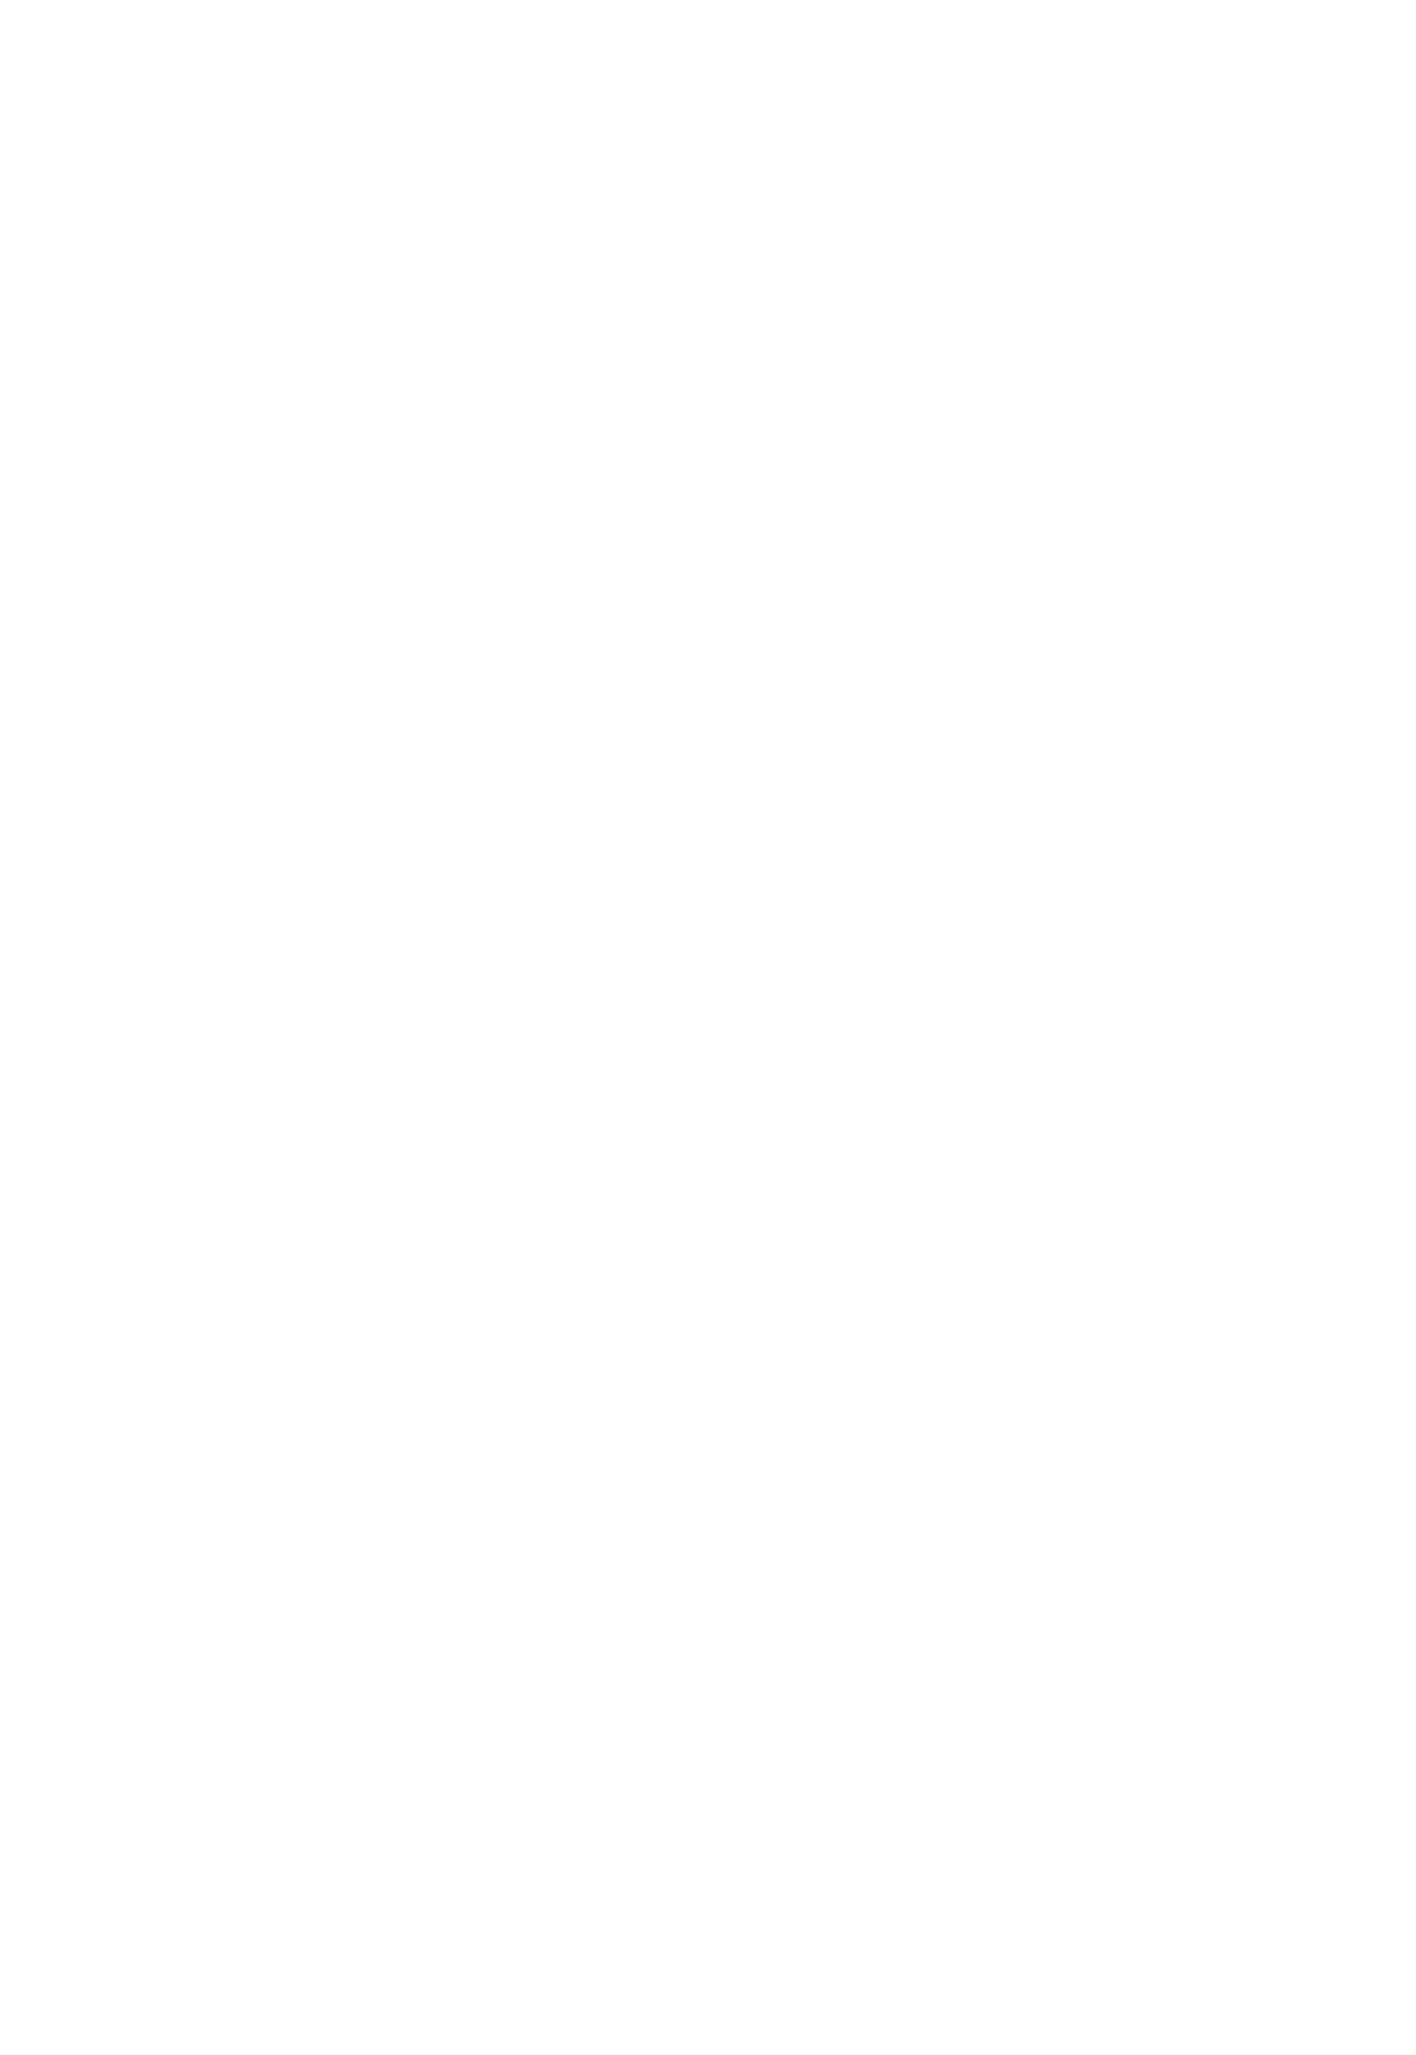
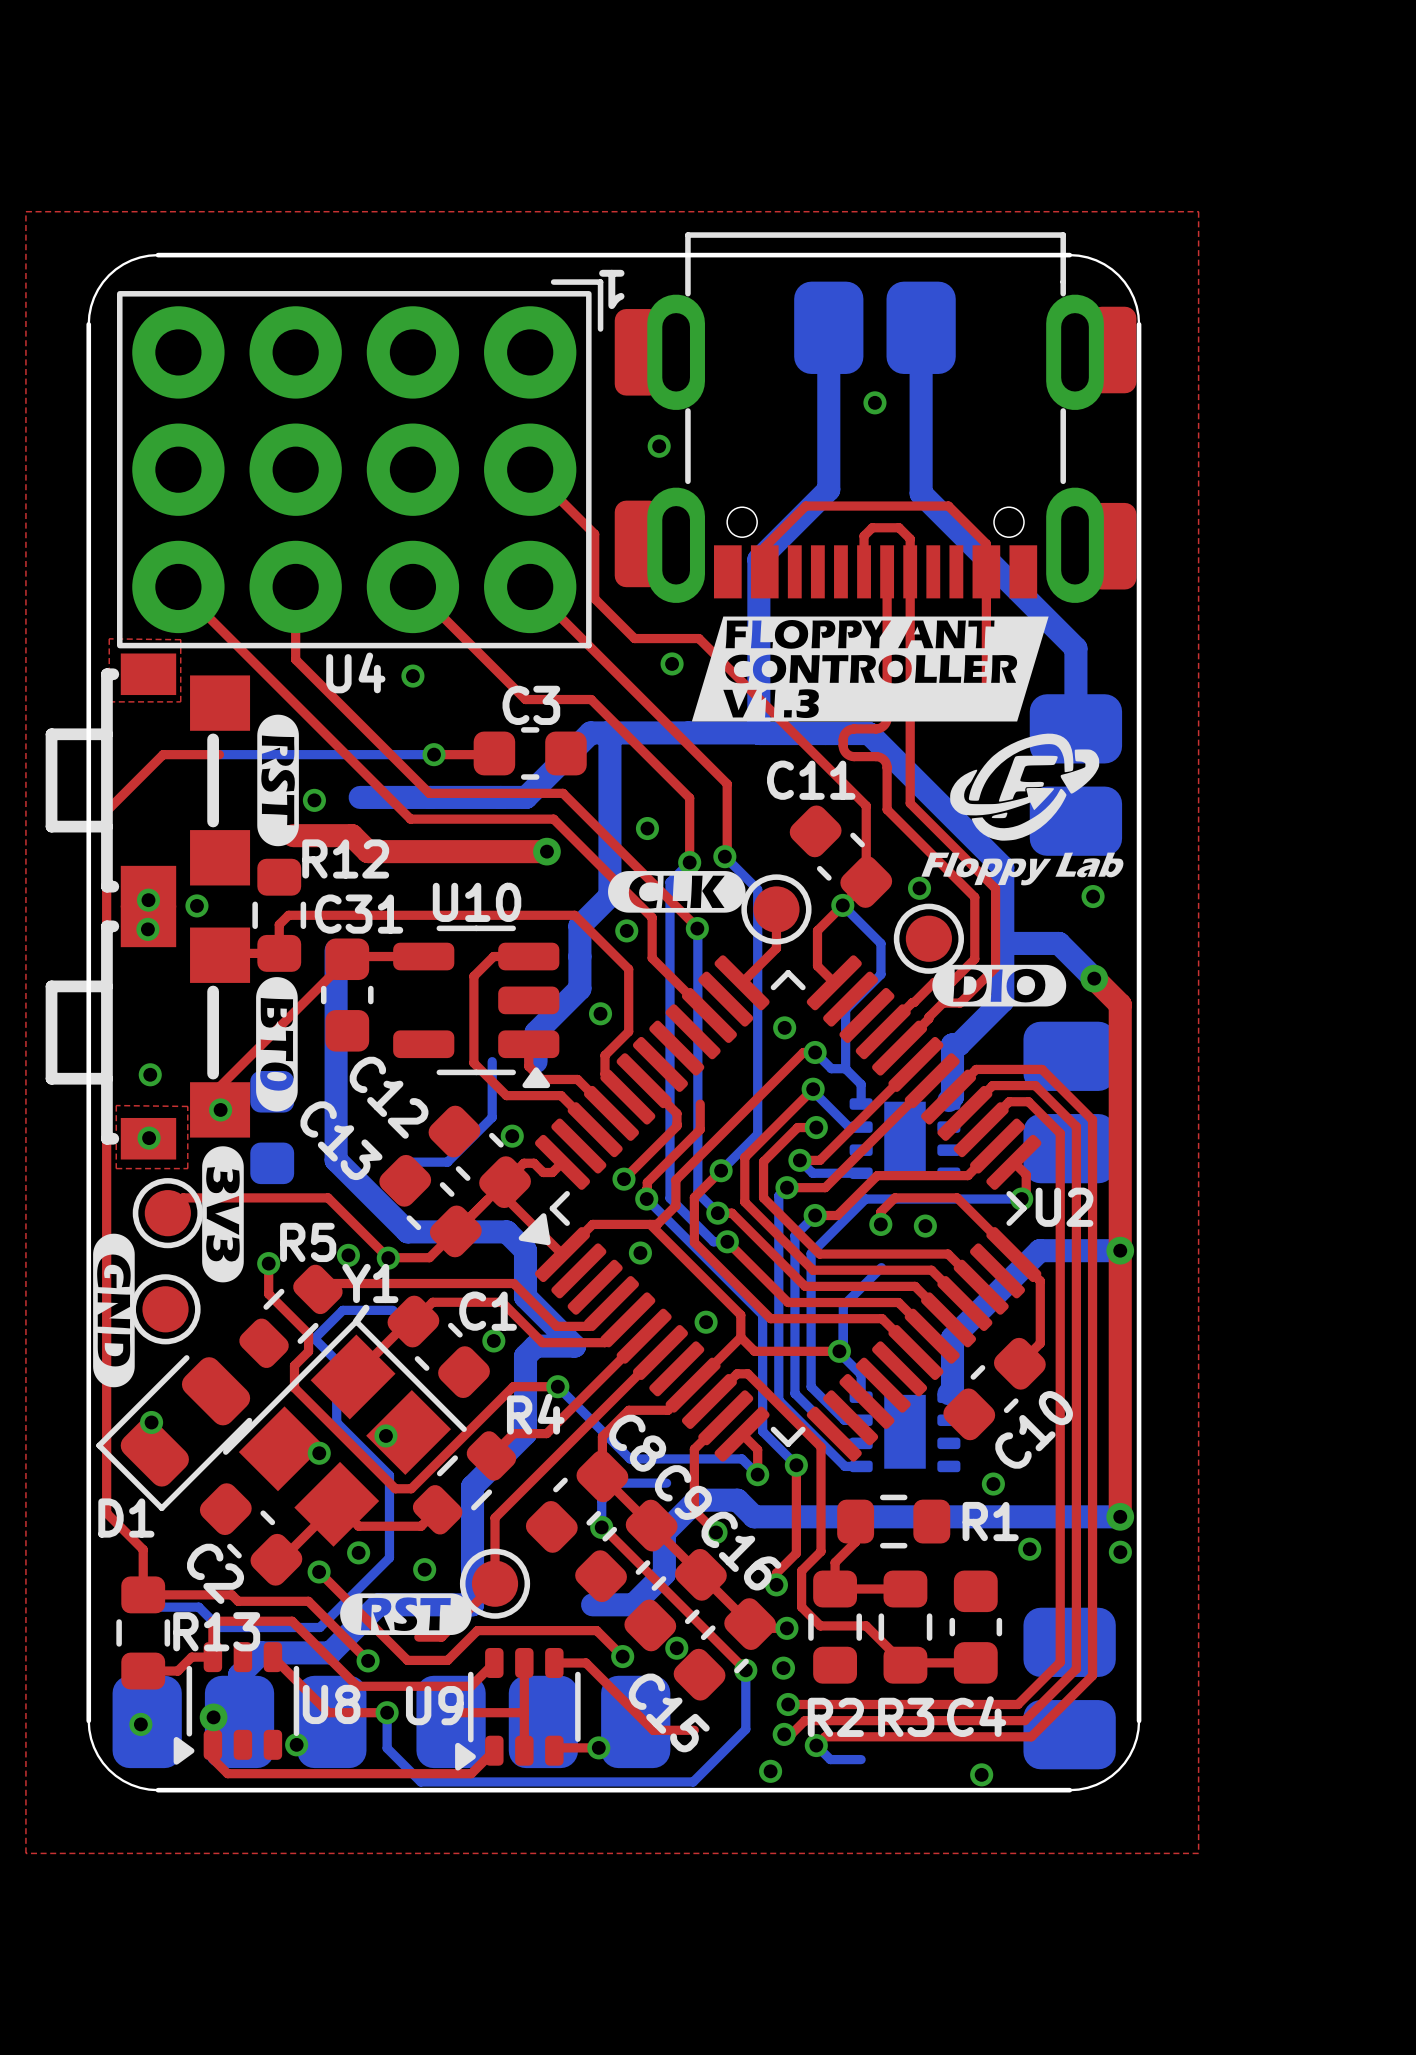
top zone outline: none -> (25, 211) (25, 1853) (1198, 1853) (1198, 211) (25, 211)
board edge: none -> (157, 255) (1069, 255) (1087, 257) (1104, 264) (1118, 275) (1129, 289) (1136, 306) (1139, 324) (1139, 1720) (1136, 1738) (1129, 1755) (1118, 1769) (1104, 1780) (1087, 1787) (1069, 1790) (157, 1790) (140, 1787) (123, 1780) (109, 1769) (98, 1755) (91, 1738) (88, 1720) (88, 324) (94, 297) (109, 275) (131, 260) (157, 255)
bottom track: none -> (828, 327) (828, 489) (758, 559) (758, 732) (590, 732) (526, 797) (360, 797)
part: none -> (874, 327)
bottom track: none -> (921, 327) (921, 493) (1075, 648) (1075, 728)
via: none -> (874, 402)
part: none -> (875, 417)
via: none -> (659, 446)
U4: none -> (360, 463)
top track: none -> (530, 469) (594, 534) (594, 598) (634, 638) (698, 638) (866, 805) (866, 881) (817, 930) (817, 966) (834, 982)
top track: none -> (764, 571) (764, 547) (805, 506) (948, 506) (986, 543) (986, 686) (978, 694)
top track: none -> (864, 571) (864, 536) (872, 527) (899, 527) (910, 538) (910, 803) (995, 888) (995, 967) (960, 1003) (942, 1003) (899, 1048)
top track: none -> (887, 571) (886, 720) (883, 725) (878, 728) (848, 730) (843, 737) (843, 748) (850, 756) (877, 756) (884, 760) (887, 767) (887, 809) (974, 897) (974, 959) (951, 982) (934, 982) (883, 1031)
top track: none -> (178, 586) (410, 819) (553, 819) (652, 917) (652, 958) (709, 1015)
top track: none -> (295, 586) (295, 659) (429, 793) (563, 793) (697, 927)
top track: none -> (412, 586) (525, 699) (591, 699) (689, 798) (689, 862)
top track: none -> (530, 586) (727, 783) (727, 854) (724, 856)
drawing: none -> [691, 616, 1124, 886]
top zone outline: none -> (109, 638) (180, 639) (180, 701) (109, 701) (109, 638)
via: none -> (672, 663)
via: none -> (412, 676)
drawing: none -> [257, 714, 299, 847]
bottom track: none -> (607, 732) (609, 735) (609, 895) (579, 926) (579, 988) (536, 1032) (536, 1061)
bottom track: none -> (759, 733) (869, 733) (1002, 867) (1002, 1000) (958, 1044) (952, 1044) (952, 1096) (948, 1100)
top track: none -> (494, 753) (434, 754)
C3: none -> (530, 753)
top track: none -> (219, 754) (163, 754) (106, 811) (106, 1513) (143, 1549) (143, 1594) (231, 1594) (238, 1601) (308, 1601) (368, 1660)
bottom track: none -> (219, 754) (434, 754)
via: none -> (434, 754)
part: none -> (1075, 775)
part: none -> (147, 780)
via: none -> (314, 800)
via: none -> (647, 828)
top track: none -> (293, 835) (352, 835) (368, 851) (546, 851)
via: none -> (546, 851)
bottom track: none -> (724, 856) (757, 889) (757, 1134) (721, 1170)
via: none -> (724, 856)
C11: none -> (840, 856)
bottom track: none -> (689, 862) (670, 882) (670, 1198) (713, 1241) (727, 1241)
via: none -> (689, 862)
drawing: none -> [608, 871, 746, 913]
via: none -> (919, 888)
via: none -> (1093, 896)
via: none -> (148, 900)
via: none -> (196, 905)
bottom track: none -> (842, 905) (880, 943) (880, 974) (845, 1009) (845, 1068)
via: none -> (842, 905)
top track: none -> (776, 909) (776, 948) (742, 982)
part: none -> (776, 909)
R12: none -> (279, 915)
via: none -> (697, 928)
via: none -> (147, 929)
bottom track: none -> (697, 929) (697, 1193) (717, 1213)
via: none -> (626, 930)
part: none -> (928, 938)
bottom track: none -> (1002, 943) (1059, 943) (1094, 978)
bottom track: none -> (336, 950) (336, 1160) (407, 1231) (506, 1231) (525, 1250) (525, 1297) (574, 1346) (535, 1346) (525, 1356) (525, 1433) (472, 1486) (472, 1604) (378, 1604) (330, 1652) (261, 1652) (239, 1675) (239, 1721) (218, 1721) (213, 1717)
top track: none -> (220, 955) (221, 953) (279, 953) (279, 924) (288, 915) (574, 915) (628, 969) (628, 1031) (604, 1055) (604, 1074) (627, 1097)
top track: none -> (423, 956) (350, 956) (220, 1086) (220, 1109)
top track: none -> (528, 956) (493, 956) (473, 976) (473, 1063) (506, 1095) (561, 1095) (595, 1129)
drawing: none -> [932, 964, 1067, 1007]
drawing: none -> [202, 977, 298, 1283]
top track: none -> (1094, 978) (1120, 1004) (1120, 1516)
via: none -> (1094, 978)
C31: none -> (347, 995)
U10: none -> (476, 1006)
via: none -> (600, 1013)
via: none -> (784, 1027)
part: none -> (147, 1032)
top track: none -> (528, 1044) (528, 1066) (541, 1079) (577, 1079) (611, 1113)
top track: none -> (815, 1052) (803, 1052) (675, 1180) (675, 1205) (657, 1224) (592, 1224) (562, 1254) (508, 1200)
bottom track: none -> (815, 1052) (831, 1068) (845, 1068) (861, 1084) (861, 1104)
via: none -> (815, 1052)
bottom track: none -> (492, 1061) (492, 1117) (447, 1162) (407, 1162)
top track: none -> (915, 1064) (819, 1160) (799, 1160)
via: none -> (150, 1074)
top track: none -> (644, 1080) (676, 1113) (676, 1126) (624, 1179)
top track: none -> (932, 1080) (825, 1187) (786, 1187)
top track: none -> (813, 1089) (744, 1157) (744, 1202) (812, 1270) (931, 1270) (964, 1303)
bottom track: none -> (813, 1089) (848, 1127) (861, 1127)
via: none -> (813, 1089)
top track: none -> (948, 1097) (976, 1069) (1041, 1069) (1092, 1120) (1092, 1675) (1031, 1736) (825, 1736) (816, 1745)
part: none -> (1069, 1102)
top track: none -> (700, 1104) (700, 1129) (647, 1182) (647, 1188)
top zone outline: none -> (116, 1105) (187, 1106) (187, 1168) (116, 1168) (116, 1105)
via: none -> (220, 1109)
top track: none -> (964, 1113) (992, 1085) (1035, 1085) (1076, 1126) (1076, 1668) (1024, 1720) (804, 1720) (791, 1734) (784, 1734)
part: none -> (272, 1127)
top track: none -> (816, 1127) (797, 1127) (763, 1161) (763, 1197) (819, 1254) (948, 1254) (981, 1287)
via: none -> (816, 1127)
top track: none -> (981, 1129) (1009, 1101) (1028, 1101) (1060, 1133) (1060, 1662) (1018, 1704) (788, 1704)
via: none -> (512, 1136)
via: none -> (149, 1138)
part: none -> (905, 1138)
top track: none -> (997, 1146) (967, 1175) (877, 1175) (837, 1215) (815, 1215)
C12: none -> (479, 1156)
bottom track: none -> (799, 1160) (812, 1173) (861, 1173)
via: none -> (799, 1160)
top track: none -> (562, 1162) (552, 1172) (543, 1172) (533, 1163) (524, 1163) (429, 1257) (388, 1257)
top track: none -> (1013, 1162) (1026, 1174) (1026, 1194) (1021, 1199)
top track: none -> (721, 1170) (694, 1197) (694, 1242) (770, 1318) (882, 1318) (915, 1352)
via: none -> (721, 1170)
via: none -> (624, 1179)
bottom track: none -> (786, 1187) (778, 1195) (778, 1400) (844, 1466) (861, 1466)
via: none -> (786, 1187)
bottom track: none -> (646, 1199) (762, 1314) (762, 1431) (796, 1465)
via: none -> (646, 1199)
bottom track: none -> (1021, 1199) (865, 1199) (811, 1253) (811, 1386) (844, 1420) (861, 1420)
via: none -> (1021, 1199)
C13: none -> (430, 1206)
U2: none -> (780, 1208)
top track: none -> (167, 1213) (183, 1197) (328, 1197) (388, 1258)
part: none -> (167, 1213)
top track: none -> (717, 1213) (731, 1213) (805, 1286) (915, 1286) (948, 1319)
via: none -> (717, 1213)
bottom track: none -> (815, 1215) (794, 1235) (794, 1393) (844, 1443) (861, 1443)
via: none -> (815, 1215)
top track: none -> (650, 1224) (740, 1315) (740, 1337)
top track: none -> (880, 1224) (880, 1211) (894, 1197) (957, 1197) (1040, 1281) (1040, 1343) (1019, 1363)
via: none -> (880, 1224)
via: none -> (925, 1226)
drawing: none -> [93, 1233, 135, 1388]
top track: none -> (727, 1241) (788, 1302) (898, 1302) (932, 1336)
via: none -> (727, 1241)
bottom track: none -> (1120, 1250) (1039, 1250) (952, 1337) (952, 1390) (948, 1393)
via: none -> (1120, 1250)
via: none -> (640, 1253)
via: none -> (348, 1255)
via: none -> (388, 1258)
top track: none -> (268, 1263) (268, 1294) (308, 1333) (308, 1351) (294, 1365) (294, 1387) (395, 1488) (411, 1488) (513, 1386) (557, 1386)
via: none -> (268, 1263)
bottom track: none -> (881, 1267) (843, 1305) (843, 1356) (861, 1374) (861, 1397)
top track: none -> (317, 1289) (323, 1283) (513, 1283) (556, 1326) (588, 1326) (611, 1303)
line: none -> (366, 1308) (356, 1321)
part: none -> (165, 1309)
bottom track: none -> (393, 1310) (342, 1310) (314, 1338) (336, 1360) (336, 1422) (389, 1475) (389, 1557) (319, 1627) (219, 1627) (198, 1607) (151, 1607)
R5: none -> (290, 1316)
top track: none -> (627, 1319) (604, 1342) (542, 1342) (502, 1302) (432, 1302) (413, 1321) (408, 1321) (353, 1376)
via: none -> (706, 1322)
top track: none -> (644, 1336) (546, 1433) (513, 1433) (491, 1455)
top track: none -> (740, 1337) (667, 1410) (628, 1410) (602, 1436) (602, 1476) (754, 1628) (786, 1628)
top track: none -> (740, 1337) (754, 1351) (839, 1351)
via: none -> (493, 1340)
C1: none -> (438, 1346)
via: none -> (839, 1351)
top track: none -> (660, 1352) (495, 1517) (495, 1583) (441, 1637) (418, 1637)
bottom track: none -> (557, 1386) (630, 1458) (741, 1458) (757, 1474)
via: none -> (557, 1386)
C10: none -> (994, 1389)
top track: none -> (709, 1401) (737, 1373) (747, 1373) (821, 1446) (821, 1551) (801, 1570) (801, 1607) (820, 1625) (866, 1625) (905, 1665) (907, 1662) (975, 1662)
top track: none -> (725, 1417) (694, 1449) (694, 1510) (716, 1532)
via: none -> (151, 1422)
part: none -> (905, 1431)
Y1: none -> (344, 1432)
D1: none -> (174, 1433)
top track: none -> (742, 1434) (757, 1449) (757, 1474)
via: none -> (385, 1435)
via: none -> (319, 1453)
top track: none -> (796, 1465) (796, 1553) (776, 1573) (776, 1584)
via: none -> (796, 1465)
via: none -> (757, 1474)
R4: none -> (464, 1482)
bottom track: none -> (666, 1483) (619, 1483) (601, 1500) (601, 1527)
via: none -> (993, 1484)
C8: none -> (577, 1501)
top track: none -> (437, 1509) (421, 1526) (358, 1526) (336, 1504) (281, 1559) (276, 1559)
bottom track: none -> (1120, 1516) (754, 1516) (737, 1500) (696, 1500) (664, 1532) (664, 1573) (633, 1604) (592, 1604)
via: none -> (1120, 1516)
top track: none -> (855, 1521) (855, 1542) (835, 1562) (835, 1589) (905, 1589)
R1: none -> (893, 1521)
top track: none -> (601, 1527) (745, 1670)
via: none -> (601, 1527)
via: none -> (716, 1532)
C2: none -> (251, 1534)
via: none -> (1029, 1549)
C9: none -> (626, 1550)
via: none -> (358, 1552)
via: none -> (1120, 1552)
via: none -> (424, 1569)
top track: none -> (319, 1571) (407, 1660) (447, 1660) (477, 1630) (596, 1630) (622, 1658)
via: none -> (319, 1571)
part: none -> (495, 1583)
via: none -> (776, 1584)
drawing: none -> [340, 1593, 472, 1636]
C16: none -> (675, 1600)
R2: none -> (835, 1627)
R3: none -> (905, 1627)
C4: none -> (975, 1627)
via: none -> (786, 1628)
R13: none -> (143, 1632)
via: none -> (676, 1648)
C15: none -> (724, 1649)
via: none -> (622, 1656)
top track: none -> (272, 1657) (328, 1712) (387, 1712)
via: none -> (368, 1660)
top track: none -> (494, 1662) (471, 1686) (357, 1686) (292, 1621) (212, 1621) (212, 1657) (191, 1657) (177, 1671) (143, 1671)
top track: none -> (524, 1662) (524, 1750)
top track: none -> (554, 1662) (586, 1662) (653, 1730) (694, 1730)
via: none -> (783, 1668)
bottom track: none -> (745, 1670) (745, 1729) (693, 1781) (420, 1781) (387, 1748) (387, 1712)
via: none -> (745, 1670)
part: none -> (1069, 1688)
U8: none -> (236, 1703)
via: none -> (788, 1704)
U9: none -> (517, 1709)
via: none -> (387, 1712)
top track: none -> (460, 1712) (524, 1712)
top track: none -> (213, 1717) (212, 1758) (227, 1773) (471, 1773) (494, 1750)
via: none -> (213, 1717)
part: none -> (239, 1721)
part: none -> (543, 1721)
via: none -> (140, 1724)
via: none -> (784, 1734)
via: none -> (296, 1744)
bottom track: none -> (816, 1745) (830, 1759) (861, 1759)
via: none -> (816, 1745)
top track: none -> (598, 1747) (557, 1747) (554, 1750)
via: none -> (598, 1747)
via: none -> (770, 1771)
via: none -> (981, 1774)

